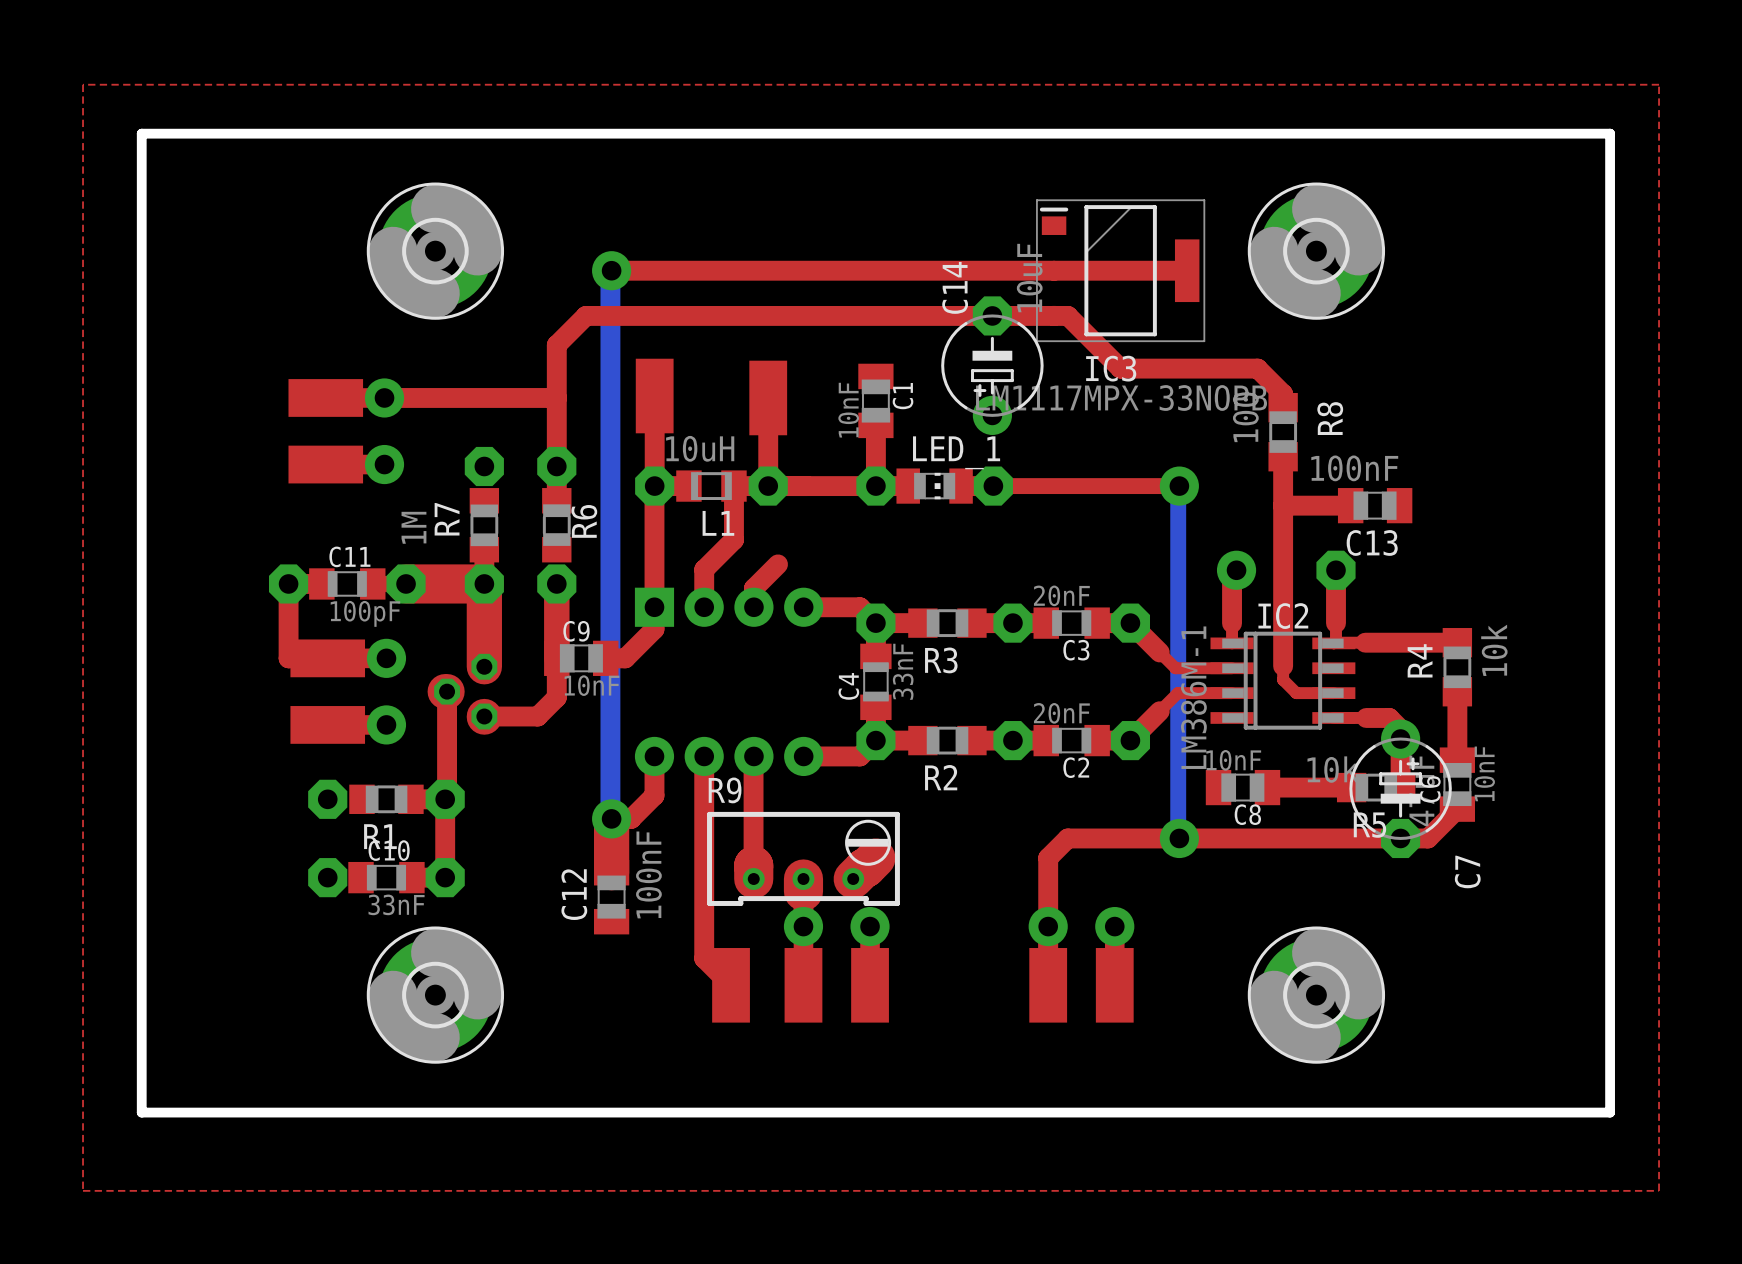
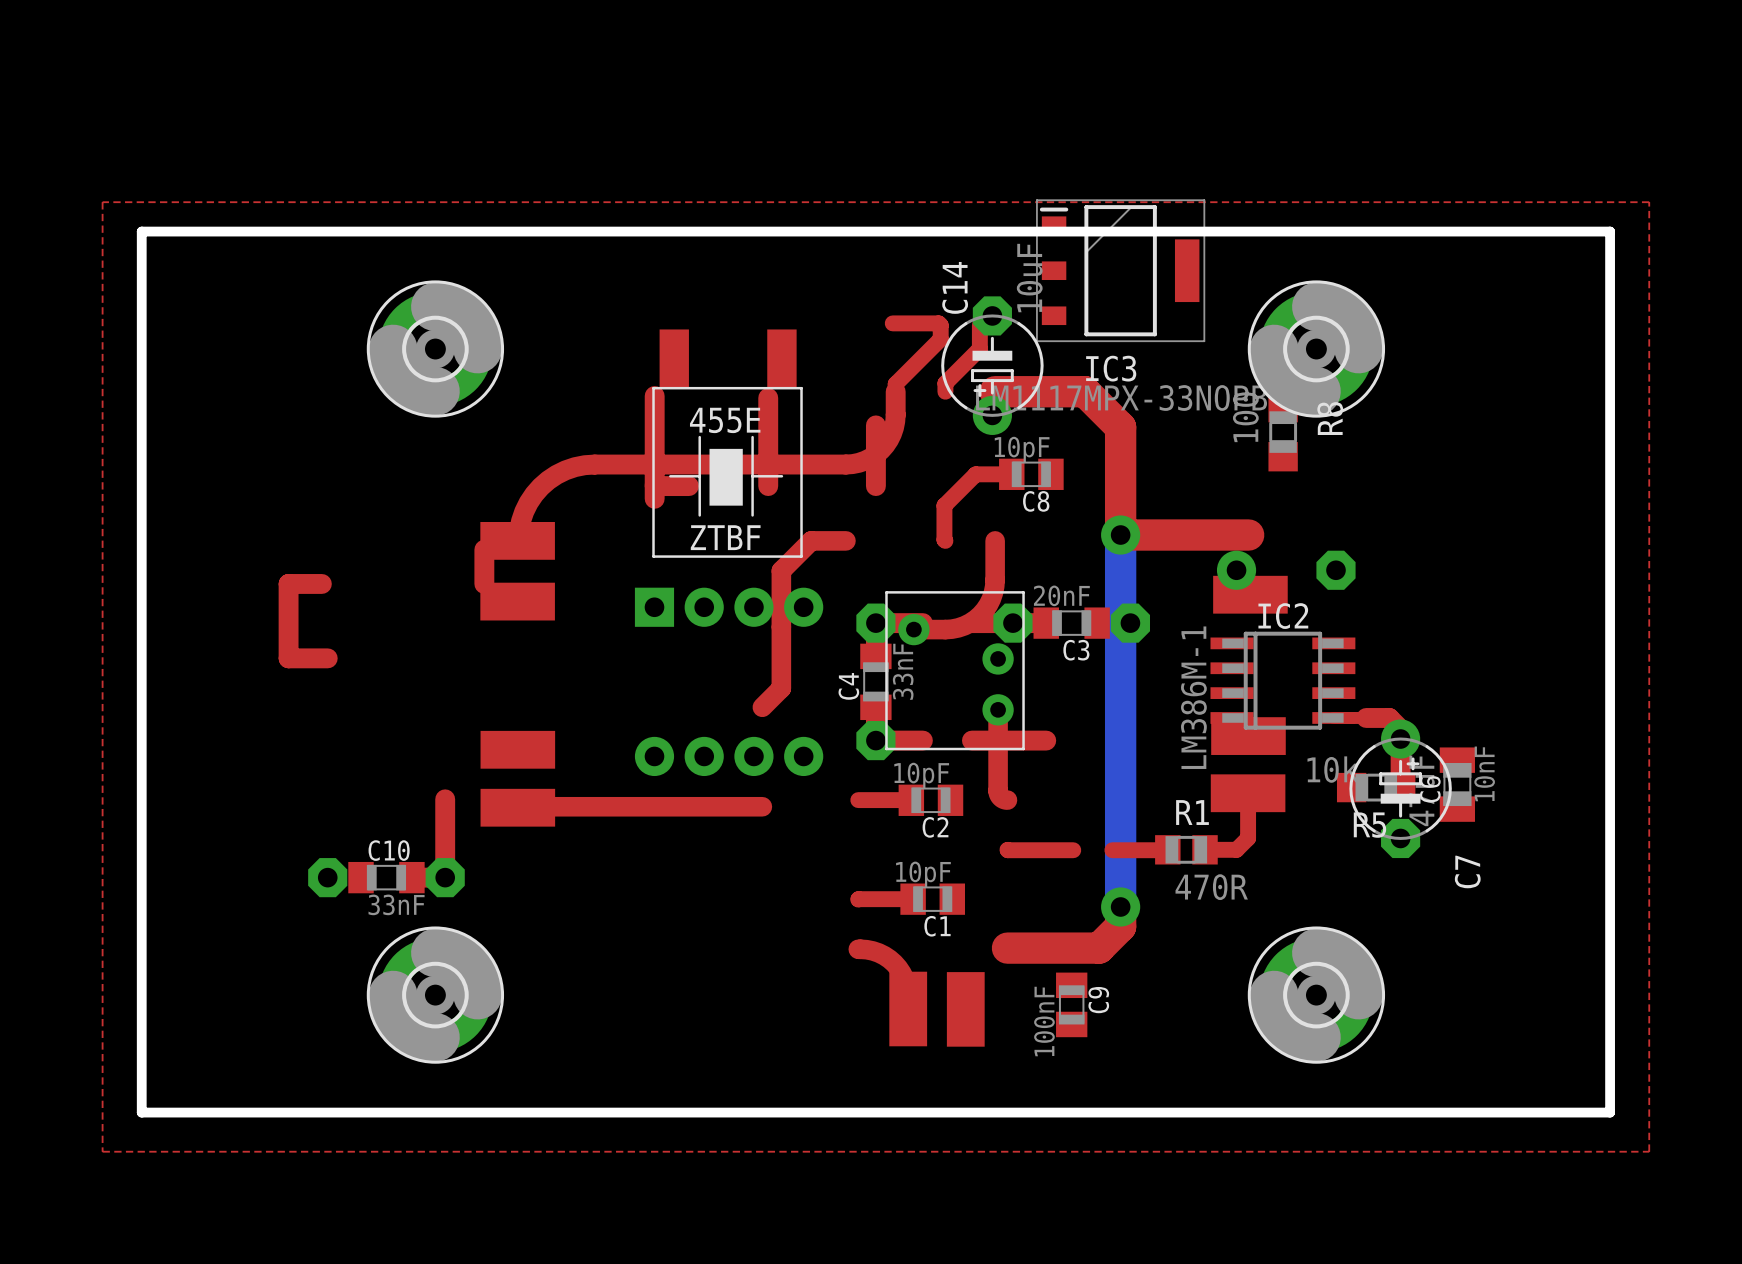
top zone outline: (83, 84) (83, 1190) (1659, 1190) (1659, 84) (83, 84) -> (102, 202) (102, 1151) (1649, 1151) (1649, 202) (102, 202)
board edge: (141, 231) (141, 133) (1610, 133) (1610, 231) -> (141, 231) (1610, 231)
part position: (435, 251) -> (435, 349)
part position: (1316, 251) -> (1316, 349)
top track: (611, 270) (1187, 270) -> none
bottom track: (611, 270) (611, 818) -> none
via: (611, 270) -> none
top track: none -> (892, 323) (938, 323) (940, 325) (940, 339) (895, 384) (893, 427) (885, 445) (870, 457) (858, 462) (845, 464) (594, 464) (575, 467) (548, 480) (534, 494) (524, 511) (517, 540)
top track: none -> (979, 325) (979, 348) (945, 383) (945, 391)
C1 footprint: [858, 363, 894, 439] -> [900, 883, 965, 915]
top track: none -> (995, 391) (1085, 391) (1120, 427) (1120, 535) (1248, 535) (1250, 536)
part: (654, 396) -> none
C1 name position: C1 (903, 396) -> C1 (937, 926)
top track: (384, 397) (556, 397) -> none
part: (768, 397) -> none
top track: (1283, 407) (1283, 394) (1257, 368) (1120, 368) (1067, 315) (585, 315) (556, 345) (556, 500) -> none
C1 value: 10nF (848, 410) -> 10pF (923, 874)
part: (346, 431) -> none
part: none -> (727, 443)
top track: (1283, 456) (1283, 679) (1296, 693) (1333, 693) -> none
top track: none -> (1011, 474) (975, 474) (944, 505) (945, 540)
L1: 10uH (711, 486) -> none
top track: (908, 486) (733, 486) (733, 539) (704, 569) (704, 607) -> none
LED_1: (934, 486) -> none
top track: (961, 486) (1179, 486) -> none
bottom track: (1179, 486) (1179, 838) -> none
via position: (1179, 486) -> (1120, 535)
top track: (654, 498) (654, 629) (625, 658) (605, 658) -> none
top track: (1283, 505) (1350, 505) -> none
C13: 100nF (1375, 505) -> none
R7: 1M (484, 525) -> none
R6: (556, 525) -> none
bottom track: none -> (1120, 535) (1120, 907)
part: none -> (517, 540)
top track: none -> (845, 540) (811, 540) (781, 570) (781, 688) (762, 707)
top track: none -> (995, 540) (994, 586) (988, 604) (980, 615) (970, 622) (958, 627) (913, 629)
top track: (778, 564) (753, 588) (753, 607) -> none
top track: (1335, 568) (1335, 641) (1333, 643) -> none
top track: (1236, 570) (1232, 574) (1232, 643) -> none
C11: 100pF (347, 583) -> none
top track: (372, 583) (484, 583) (484, 666) -> none
top track: (556, 583) (556, 697) (537, 716) (484, 717) -> none
part: none -> (1250, 594)
part: none -> (517, 601)
top track: (803, 607) (860, 607) (875, 623) -> none
R3: (947, 623) -> none
top track: (1097, 623) (1130, 623) (1175, 668) (1232, 668) -> none
C9 footprint: [544, 640, 619, 676] -> [1056, 972, 1088, 1038]
top track: (1334, 642) (1457, 642) -> none
R4: 10k (1457, 667) -> none
part: none -> (955, 670)
C9 value: 10nF (592, 685) -> 100nF (1044, 1021)
part: (348, 691) -> none
top track: (445, 691) (447, 691) (447, 799) (410, 799) -> none
part: (465, 691) -> none
top track: (1457, 691) (1457, 760) -> none
top track: (1232, 693) (1177, 693) (1130, 740) (1097, 740) -> none
top track: none -> (998, 709) (998, 791) (1001, 798) (1007, 800)
C2 value: 20nF (1061, 713) -> 10pF (921, 775)
C2 footprint: [993, 721, 1151, 761] -> [898, 784, 964, 816]
part: none -> (1248, 736)
top track: (875, 740) (860, 756) (803, 756) -> none
R2: (947, 740) -> none
part: none -> (517, 749)
top track: (654, 756) (654, 795) (631, 818) (611, 818) (611, 872) -> none
top track: (704, 756) (704, 958) (731, 985) -> none
top track: (753, 756) (753, 865) -> none
C8 value: 10nF (1233, 760) -> 10pF (1022, 449)
C8 footprint: [1205, 769, 1281, 806] -> [999, 458, 1064, 490]
R1 footprint: [308, 779, 465, 819] -> [1155, 835, 1218, 865]
top track: (1267, 787) (1351, 787) -> none
top track: none -> (1248, 793) (1248, 838) (1236, 849) (1205, 849)
part: none -> (1248, 793)
top track: none -> (858, 800) (911, 800)
top track: none -> (762, 806) (517, 807)
part: none -> (517, 807)
top track: (1457, 809) (1428, 838) (1067, 838) (1048, 858) (1048, 985) -> none
via: (611, 818) -> none
R1 name position: R1 (380, 836) -> R1 (1192, 812)
via position: (1179, 838) -> (1120, 907)
top track: none -> (1007, 849) (1073, 850)
top track: none -> (1167, 849) (1112, 850)
R9: (803, 858) -> none
top track: (875, 858) (853, 879) -> none
top track: (753, 865) (753, 879) -> none
R1 value: none -> 470R (1211, 887)
top track: (803, 891) (803, 879) (803, 926) -> none
C12: 100nF (611, 897) -> none
top track: none -> (913, 899) (858, 899)
top track: none -> (1120, 907) (1120, 926) (1099, 948) (1007, 949)
top track: none -> (858, 949) (878, 952) (889, 959) (898, 967) (906, 984) (908, 1009)
part: (836, 964) -> none
part: (1081, 964) -> none
part: (731, 985) -> none
part: none -> (908, 1009)
part: none -> (965, 1009)

